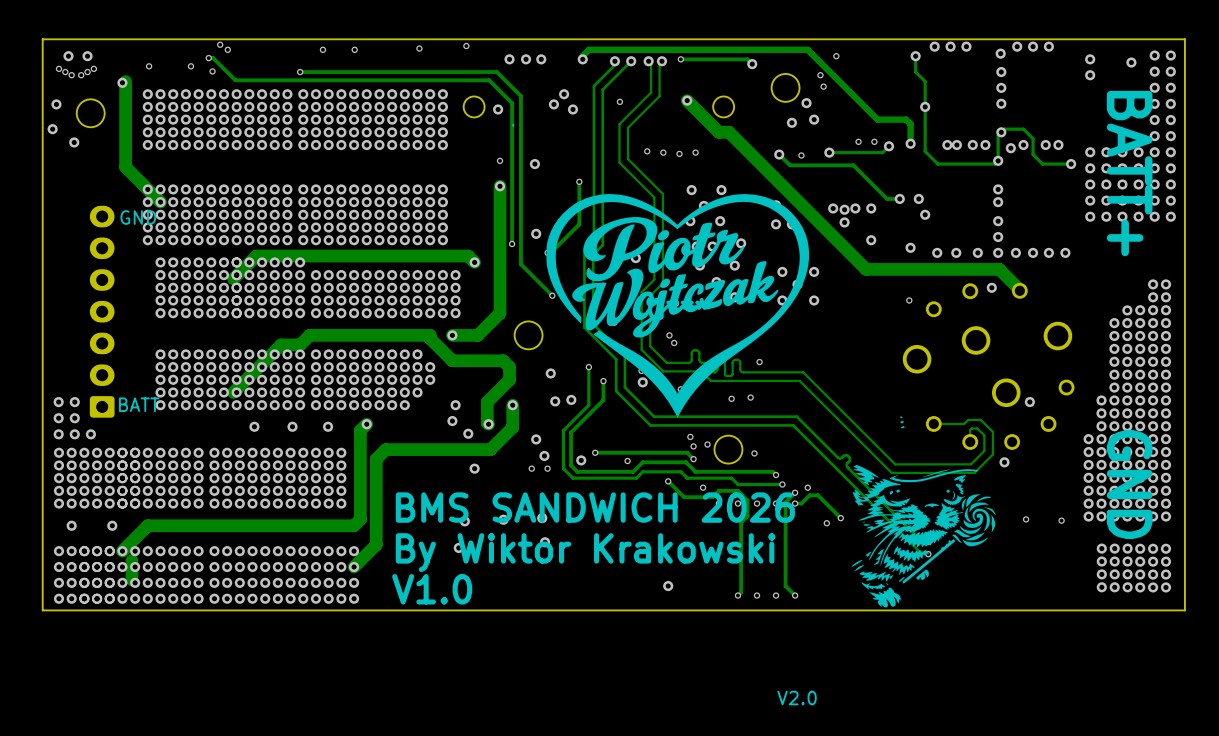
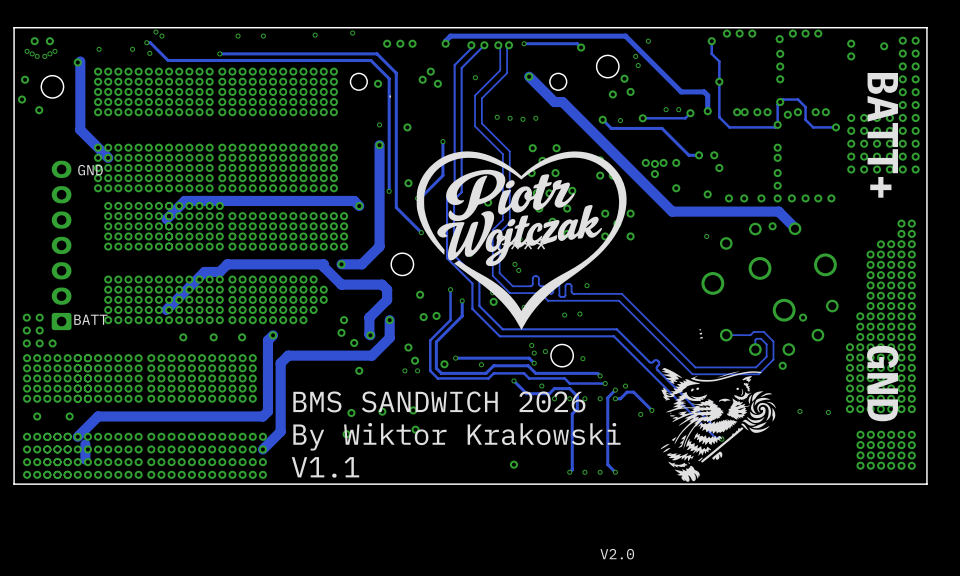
text: V1.0 (432, 589) -> V1.1 (325, 467)

